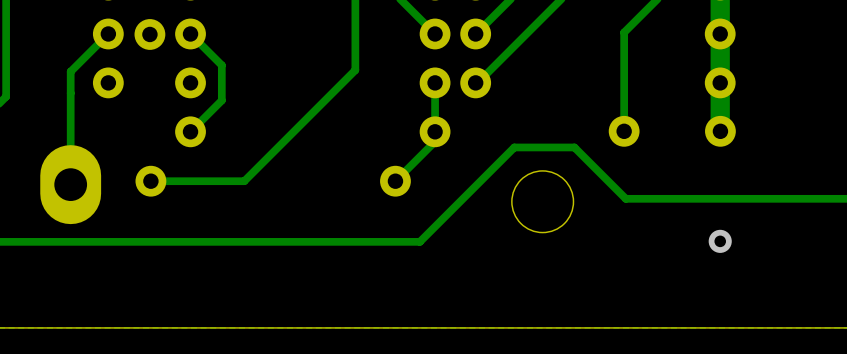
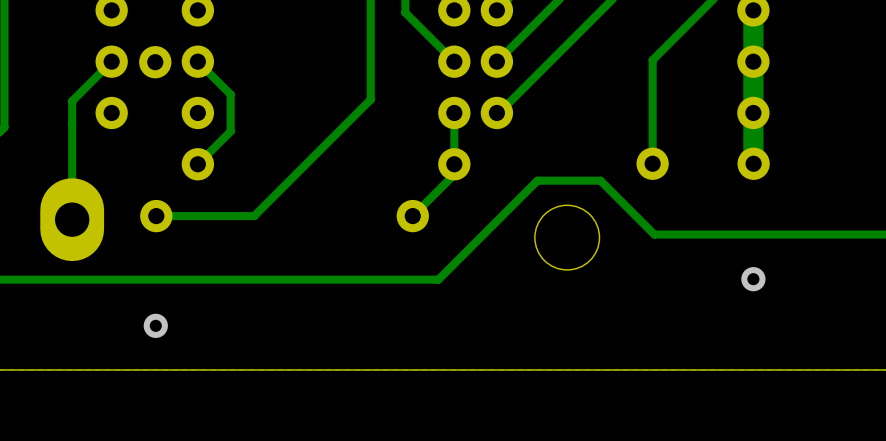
via: none -> (155, 325)

